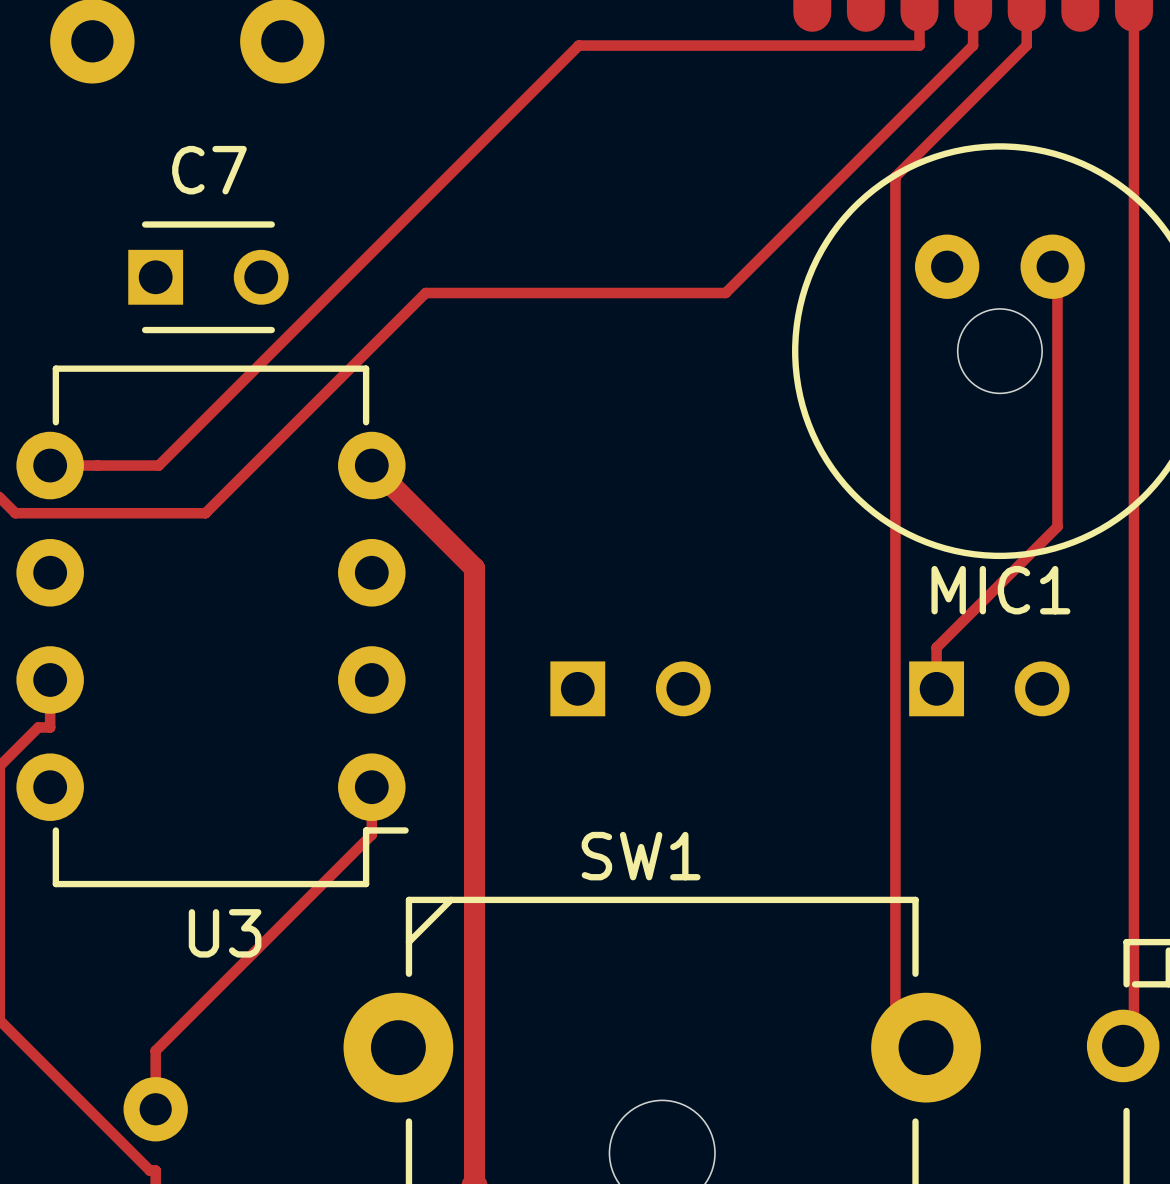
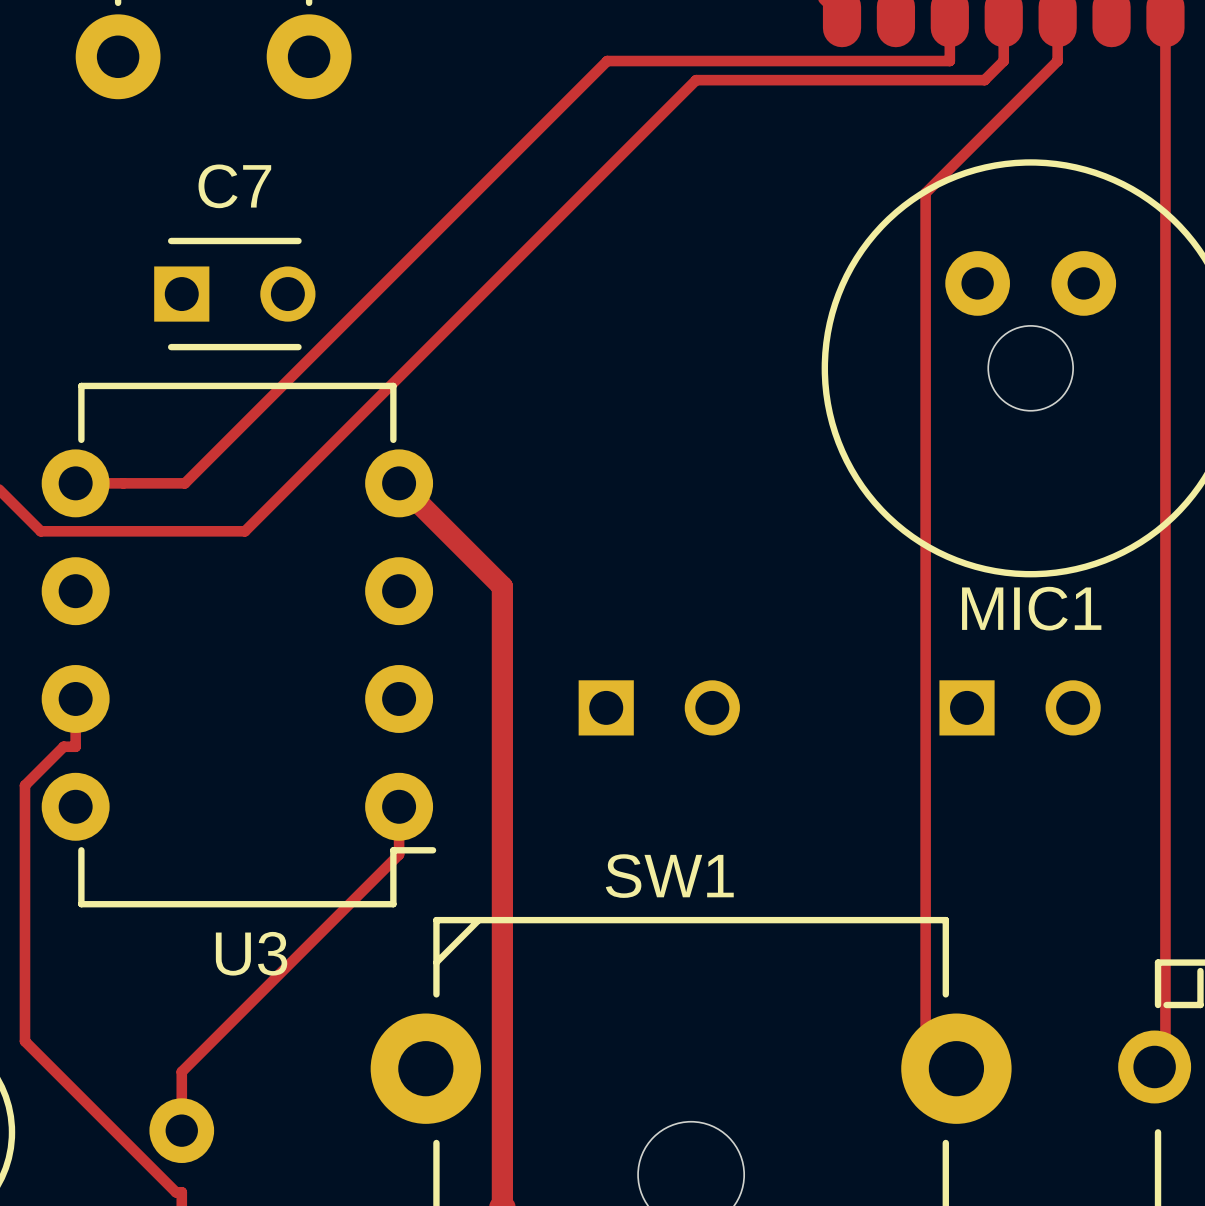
track: (954, 64) (725, 293) (425, 293) (205, 513) -> (984, 80) (696, 80) (244, 531) (231, 531)
track: (1052, 266) (1057, 271) (1057, 526) (936, 647) (936, 688) -> none

